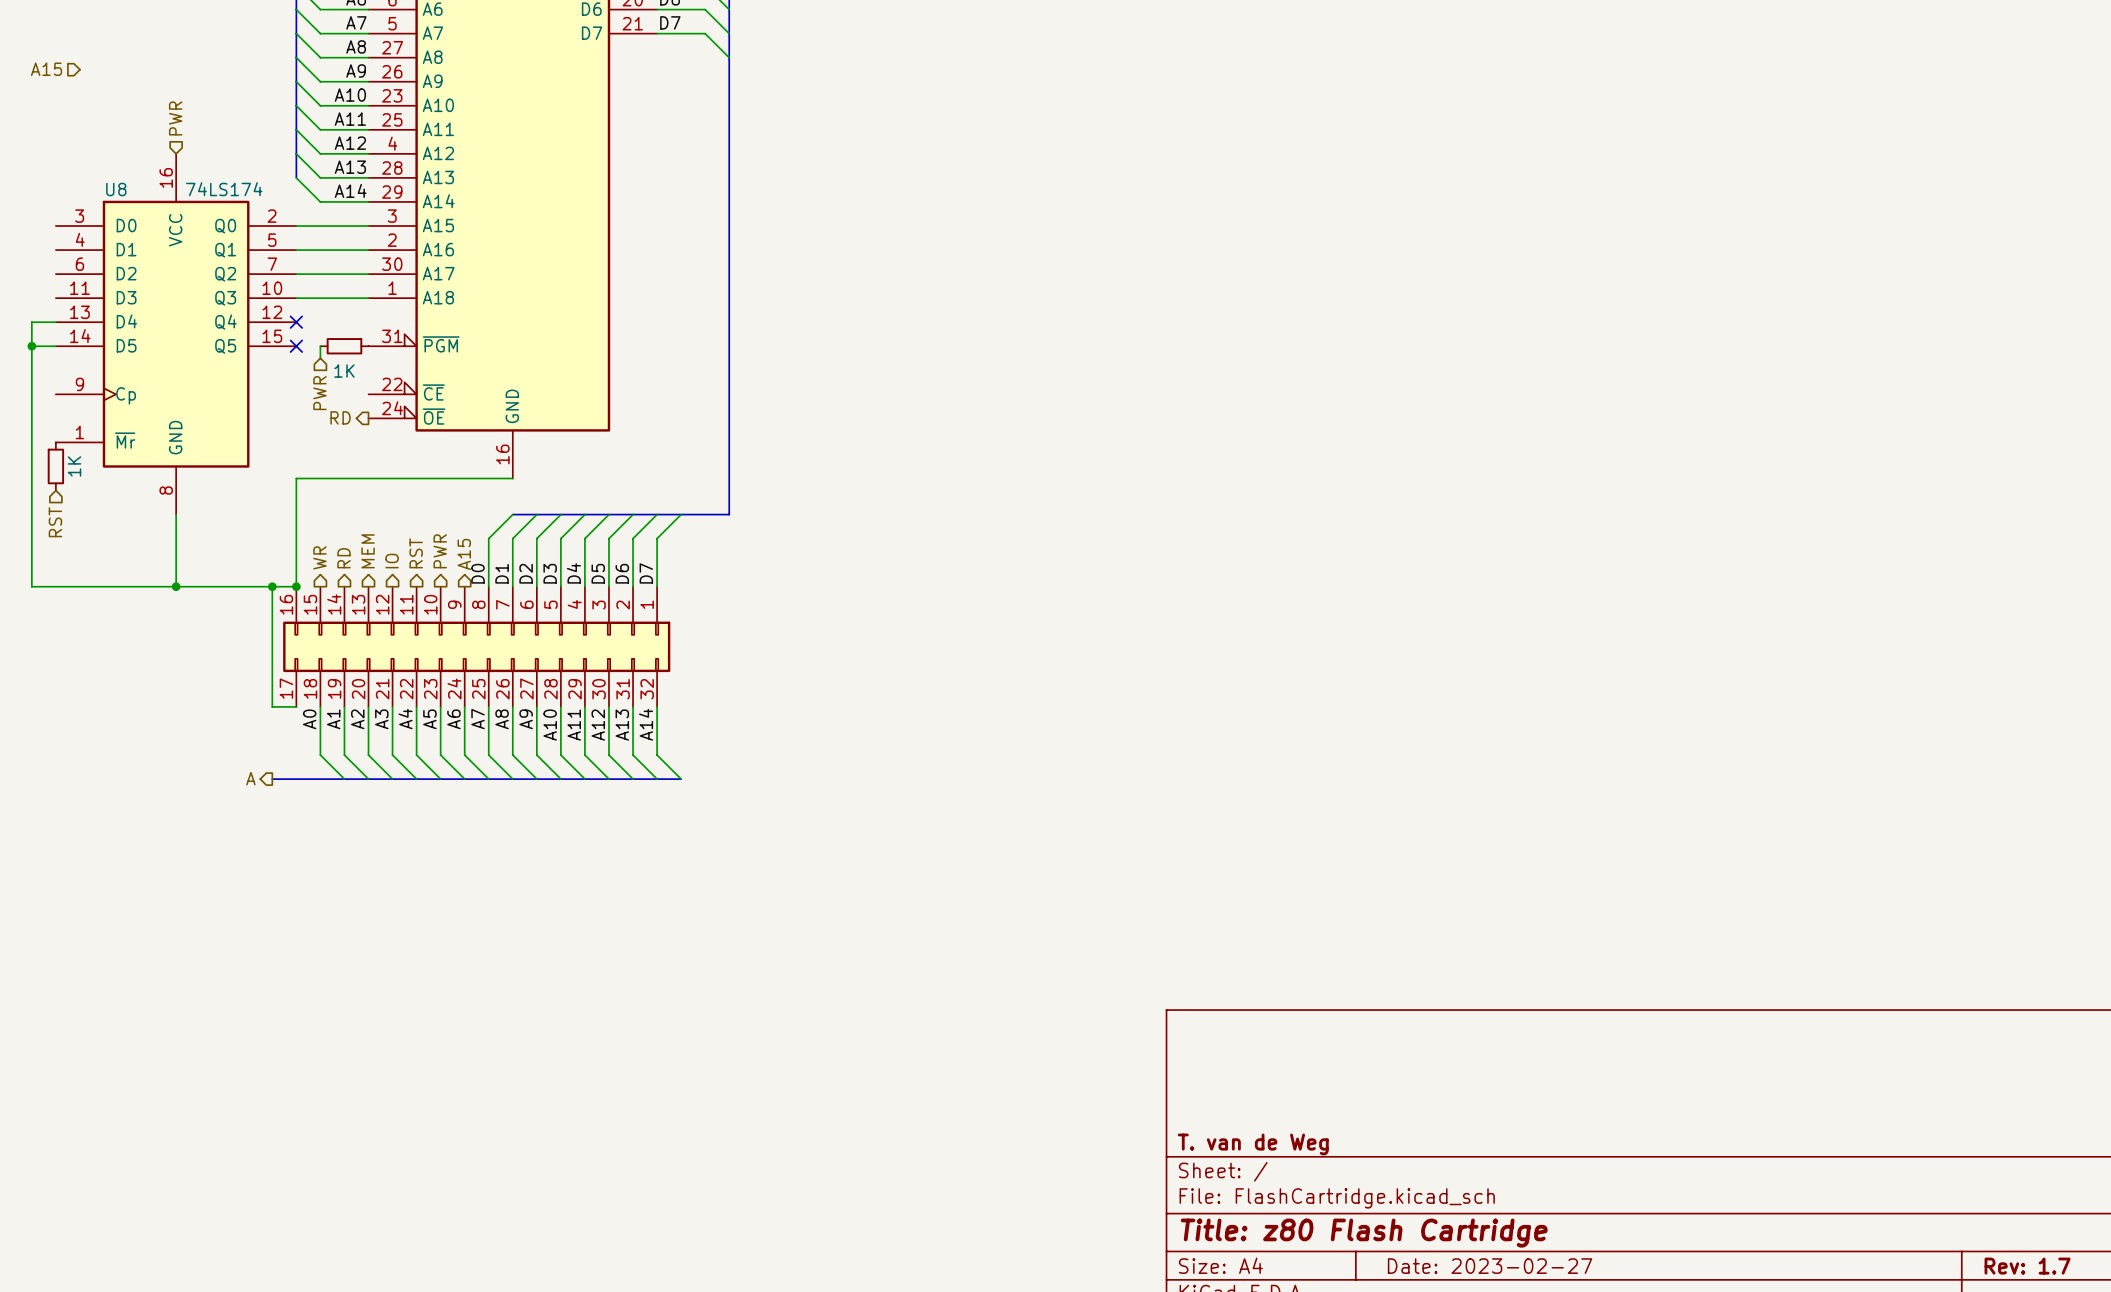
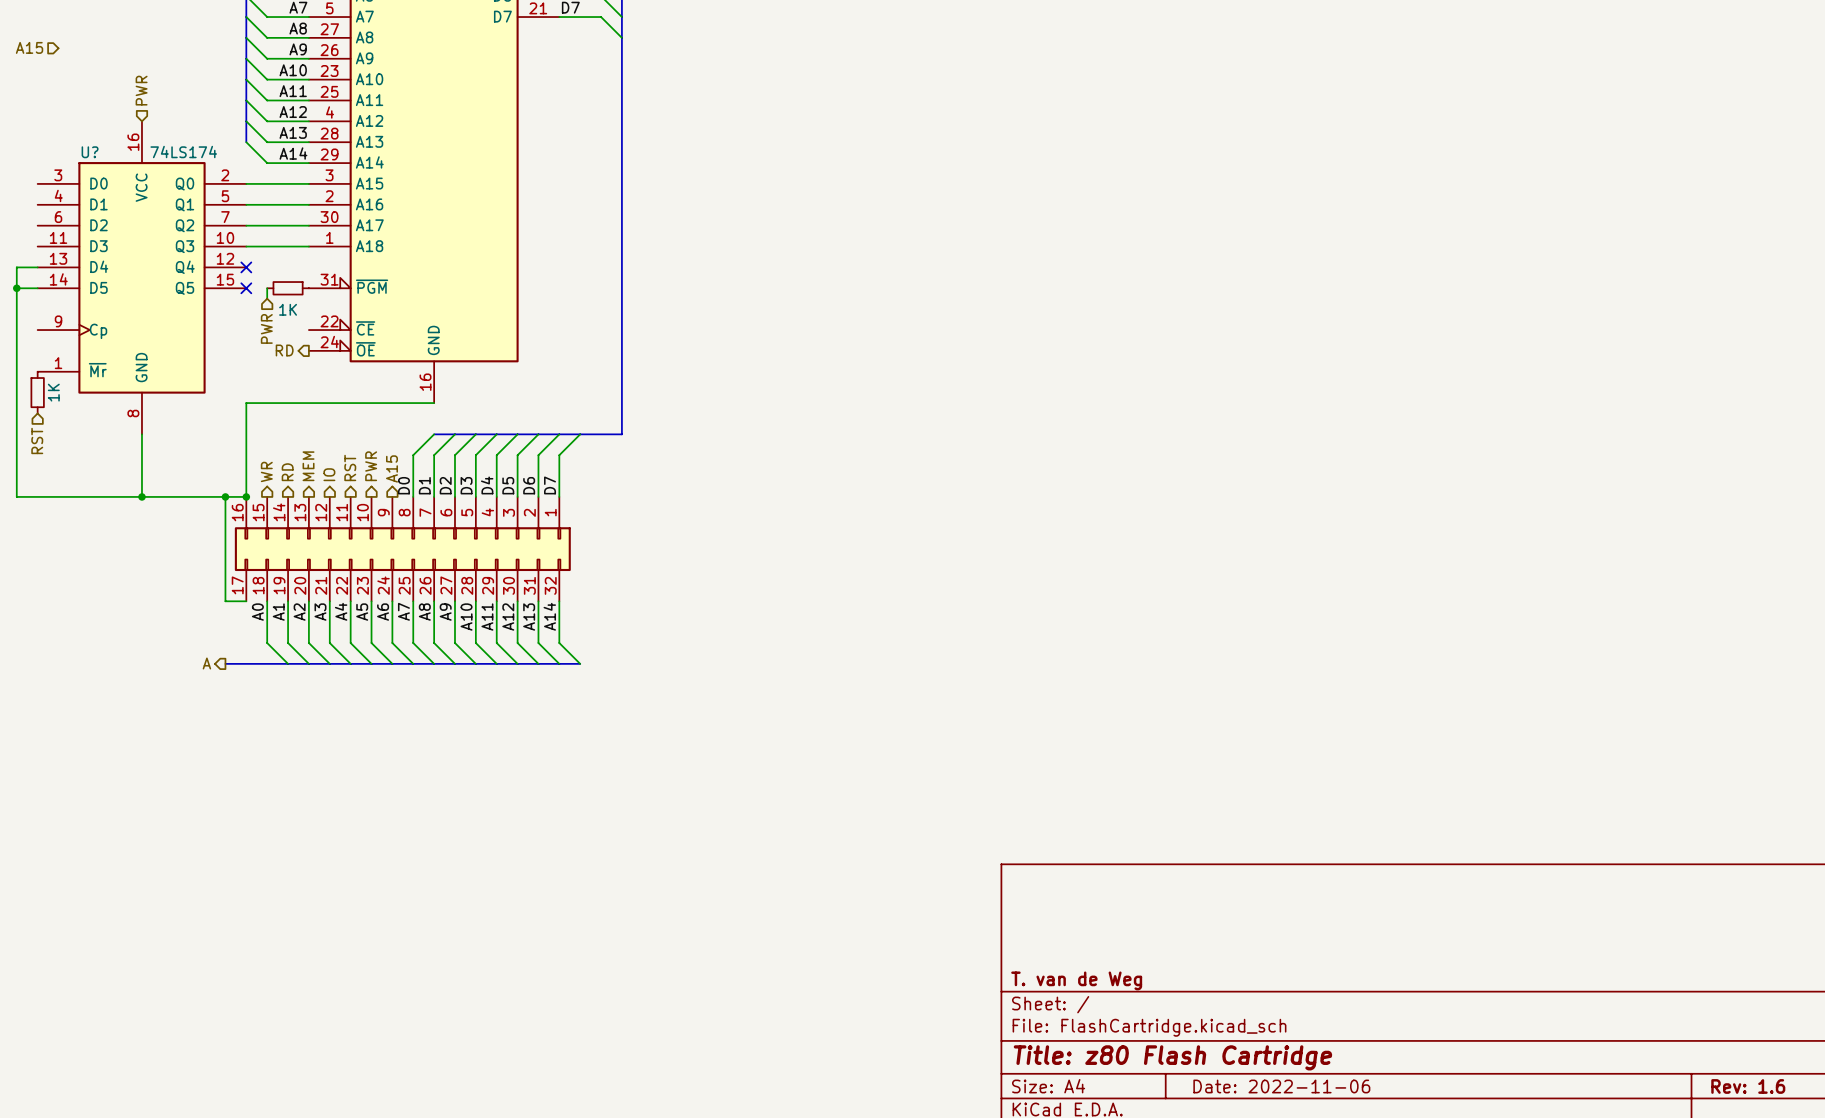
U8 name: U8 (116, 189) -> U? (90, 152)
title block: Date: 2023-02-27 (1490, 1266) -> Date: 2022-11-06 (1281, 1086)
title block: Rev: 1.7 (2027, 1266) -> Rev: 1.6 (1748, 1086)

